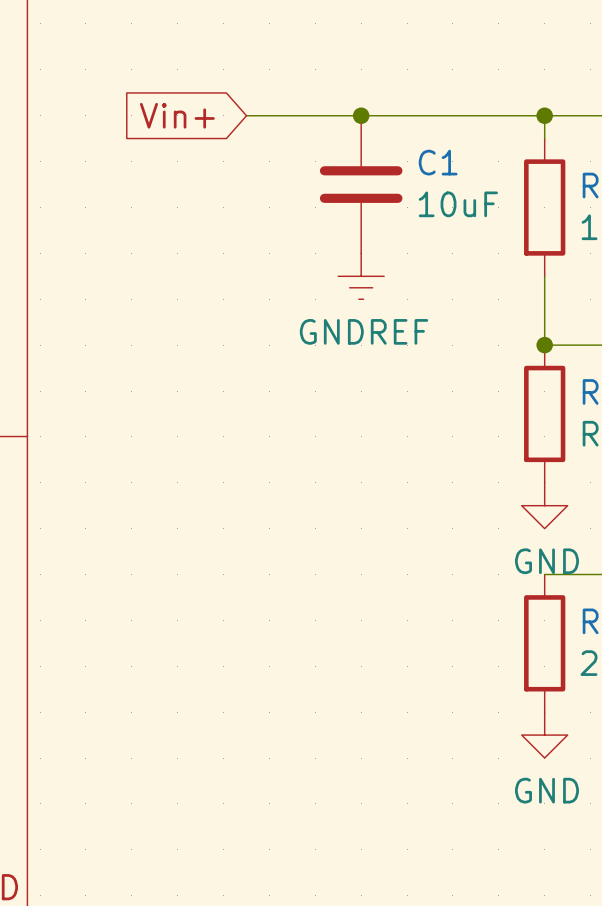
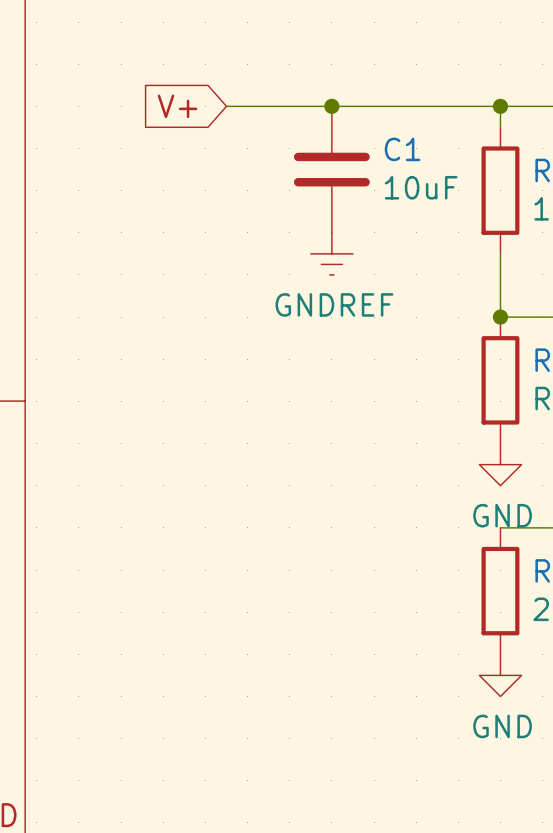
global label: Vin+ (177, 115) -> V+ (177, 106)

